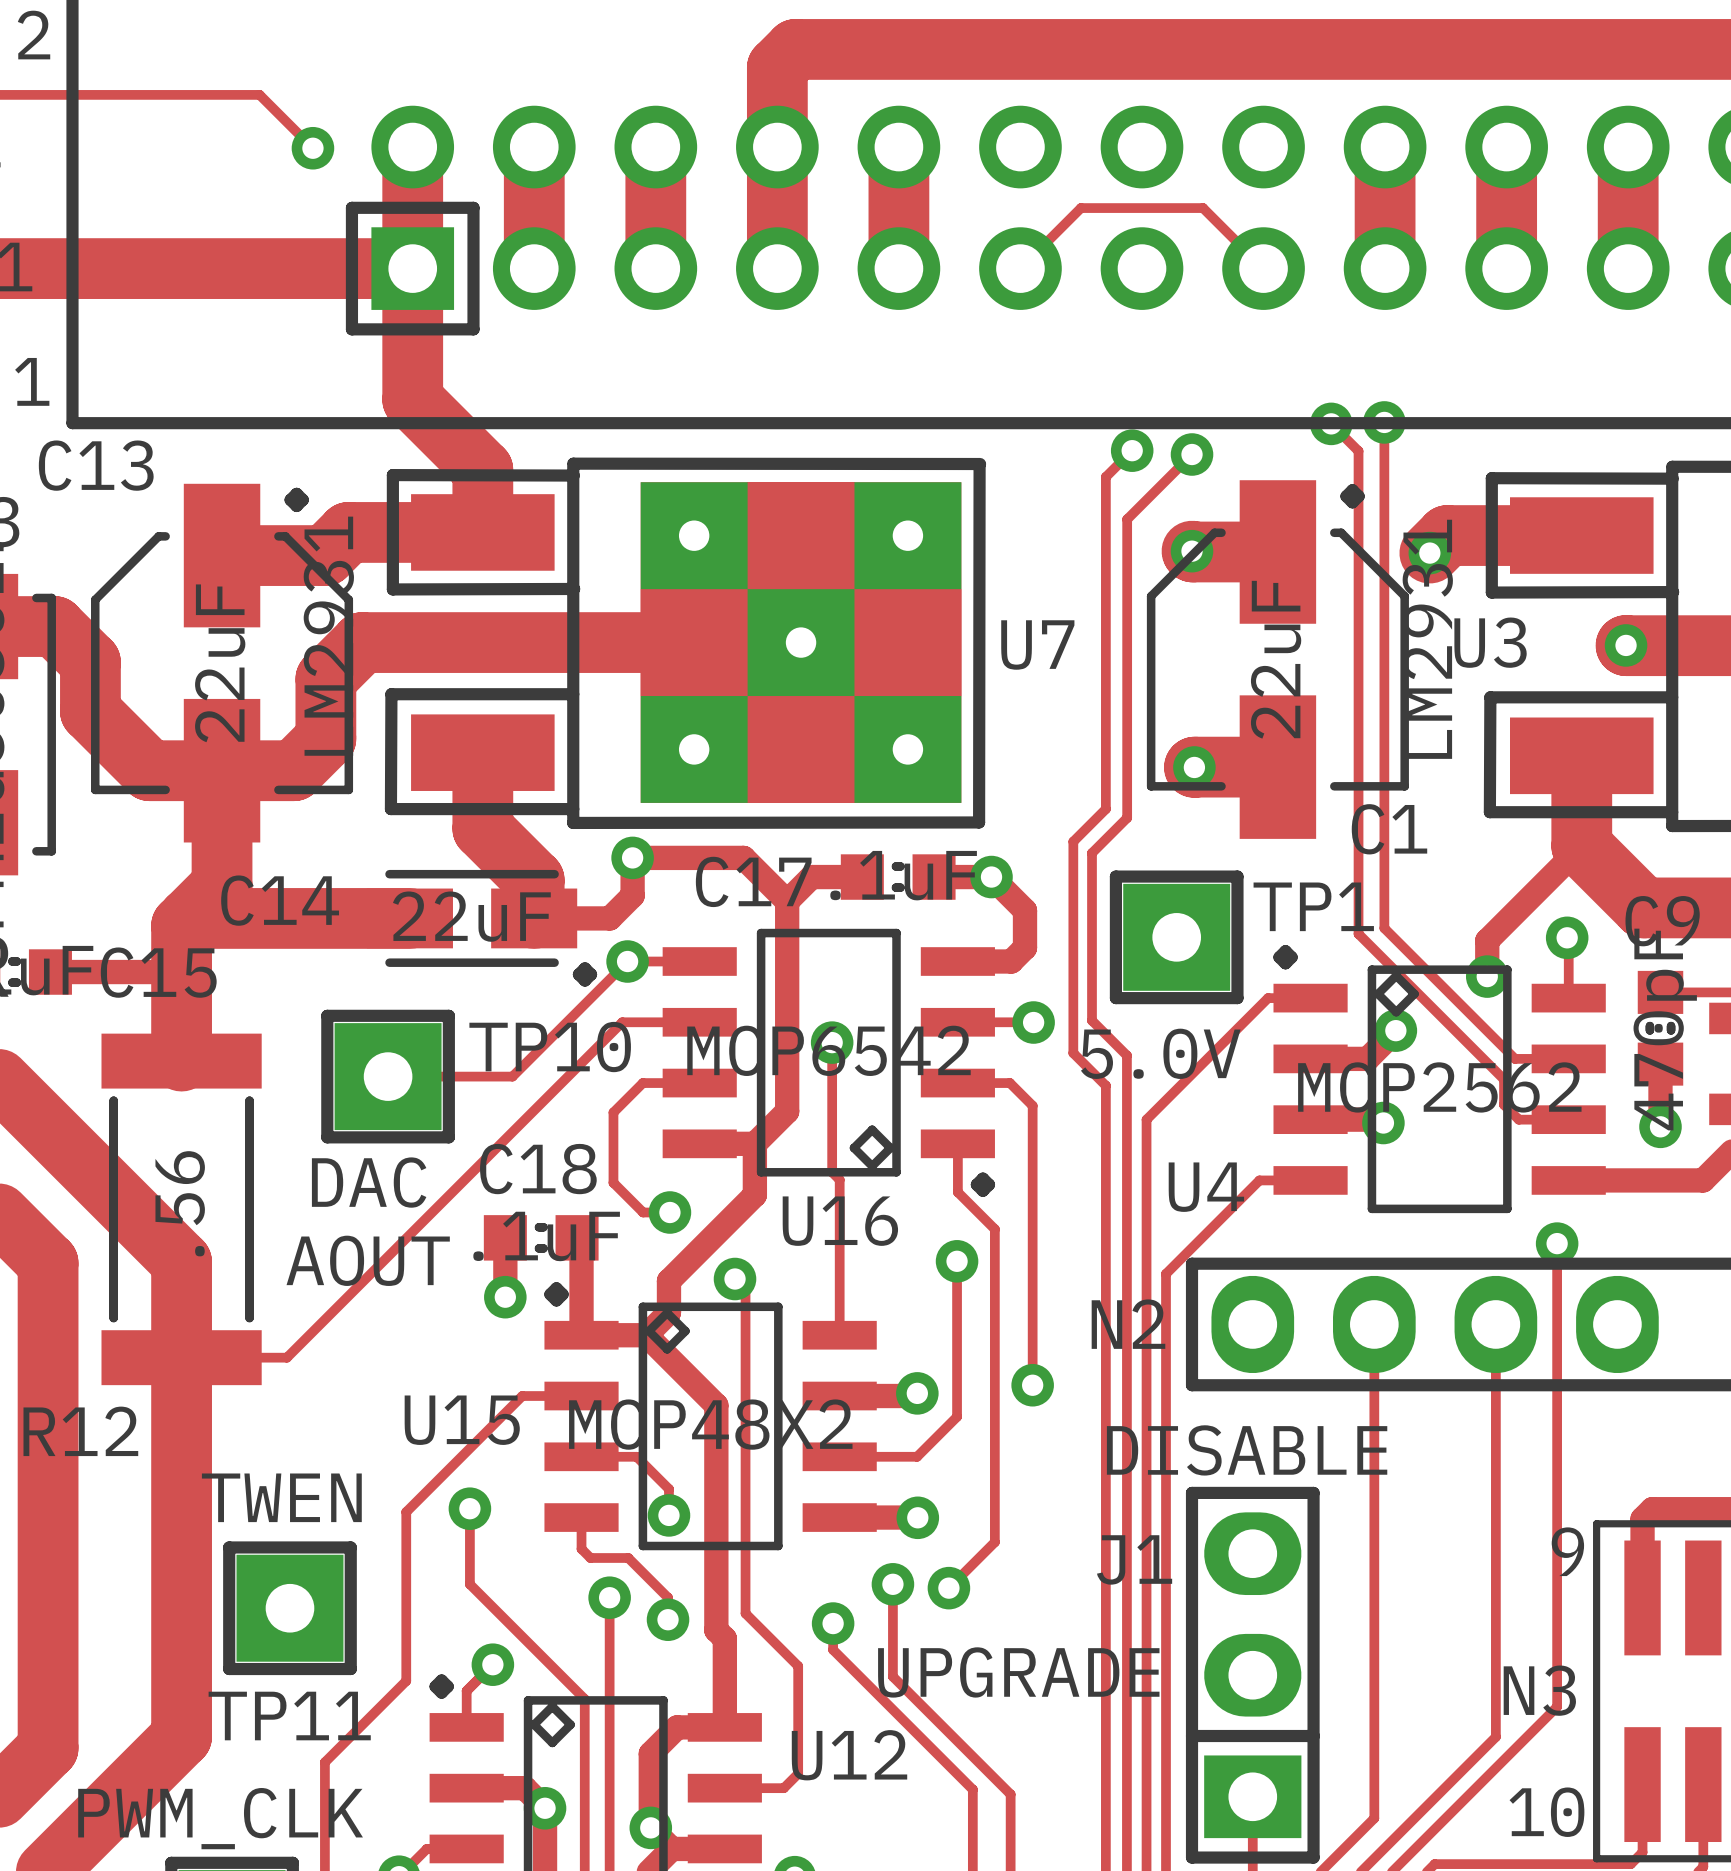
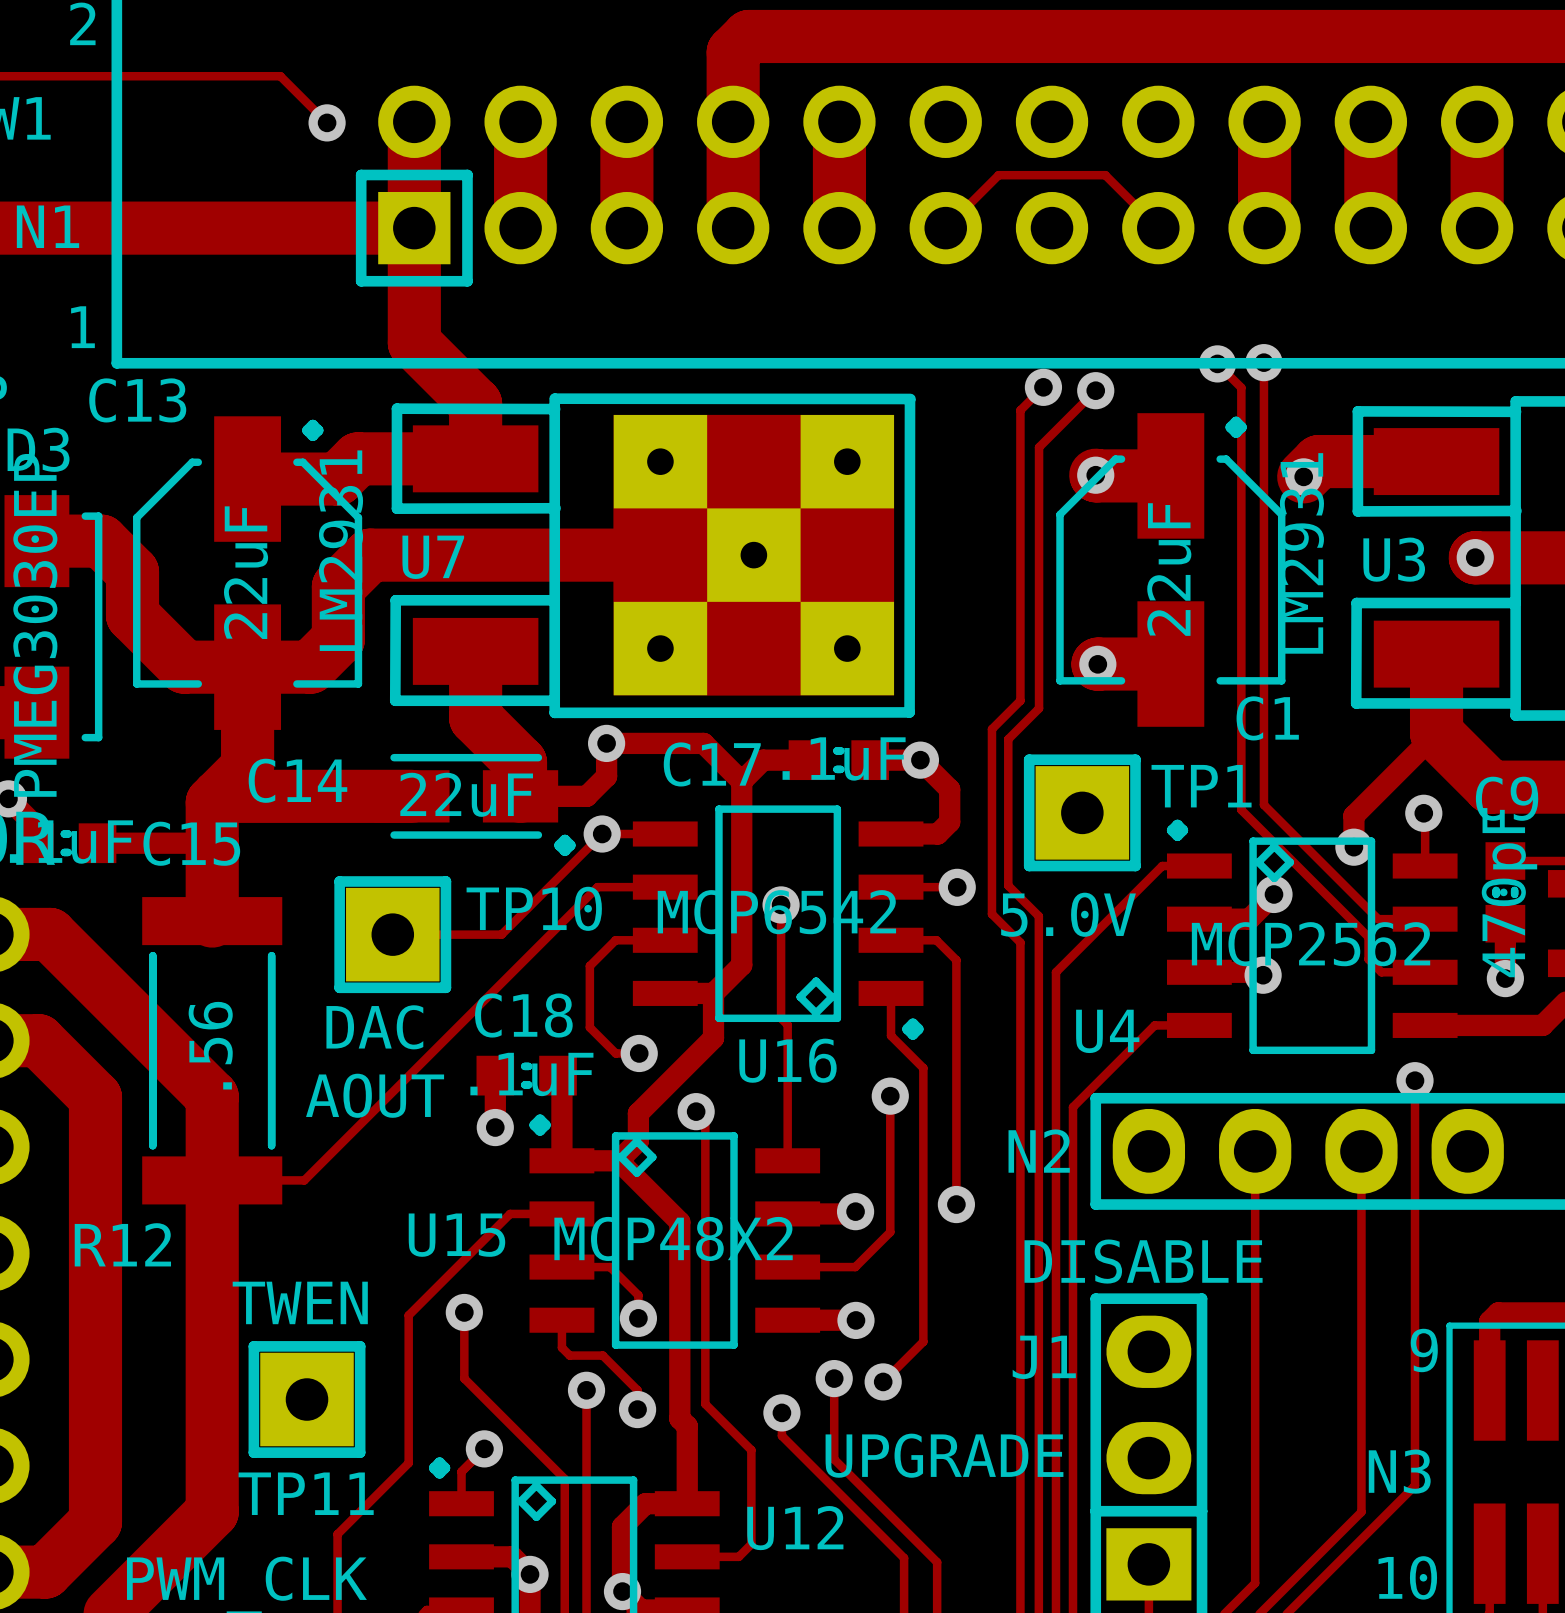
U3 name position: U3 (1490, 642) -> U3 (1394, 559)
U7 name position: U7 (1037, 644) -> U7 (433, 557)

